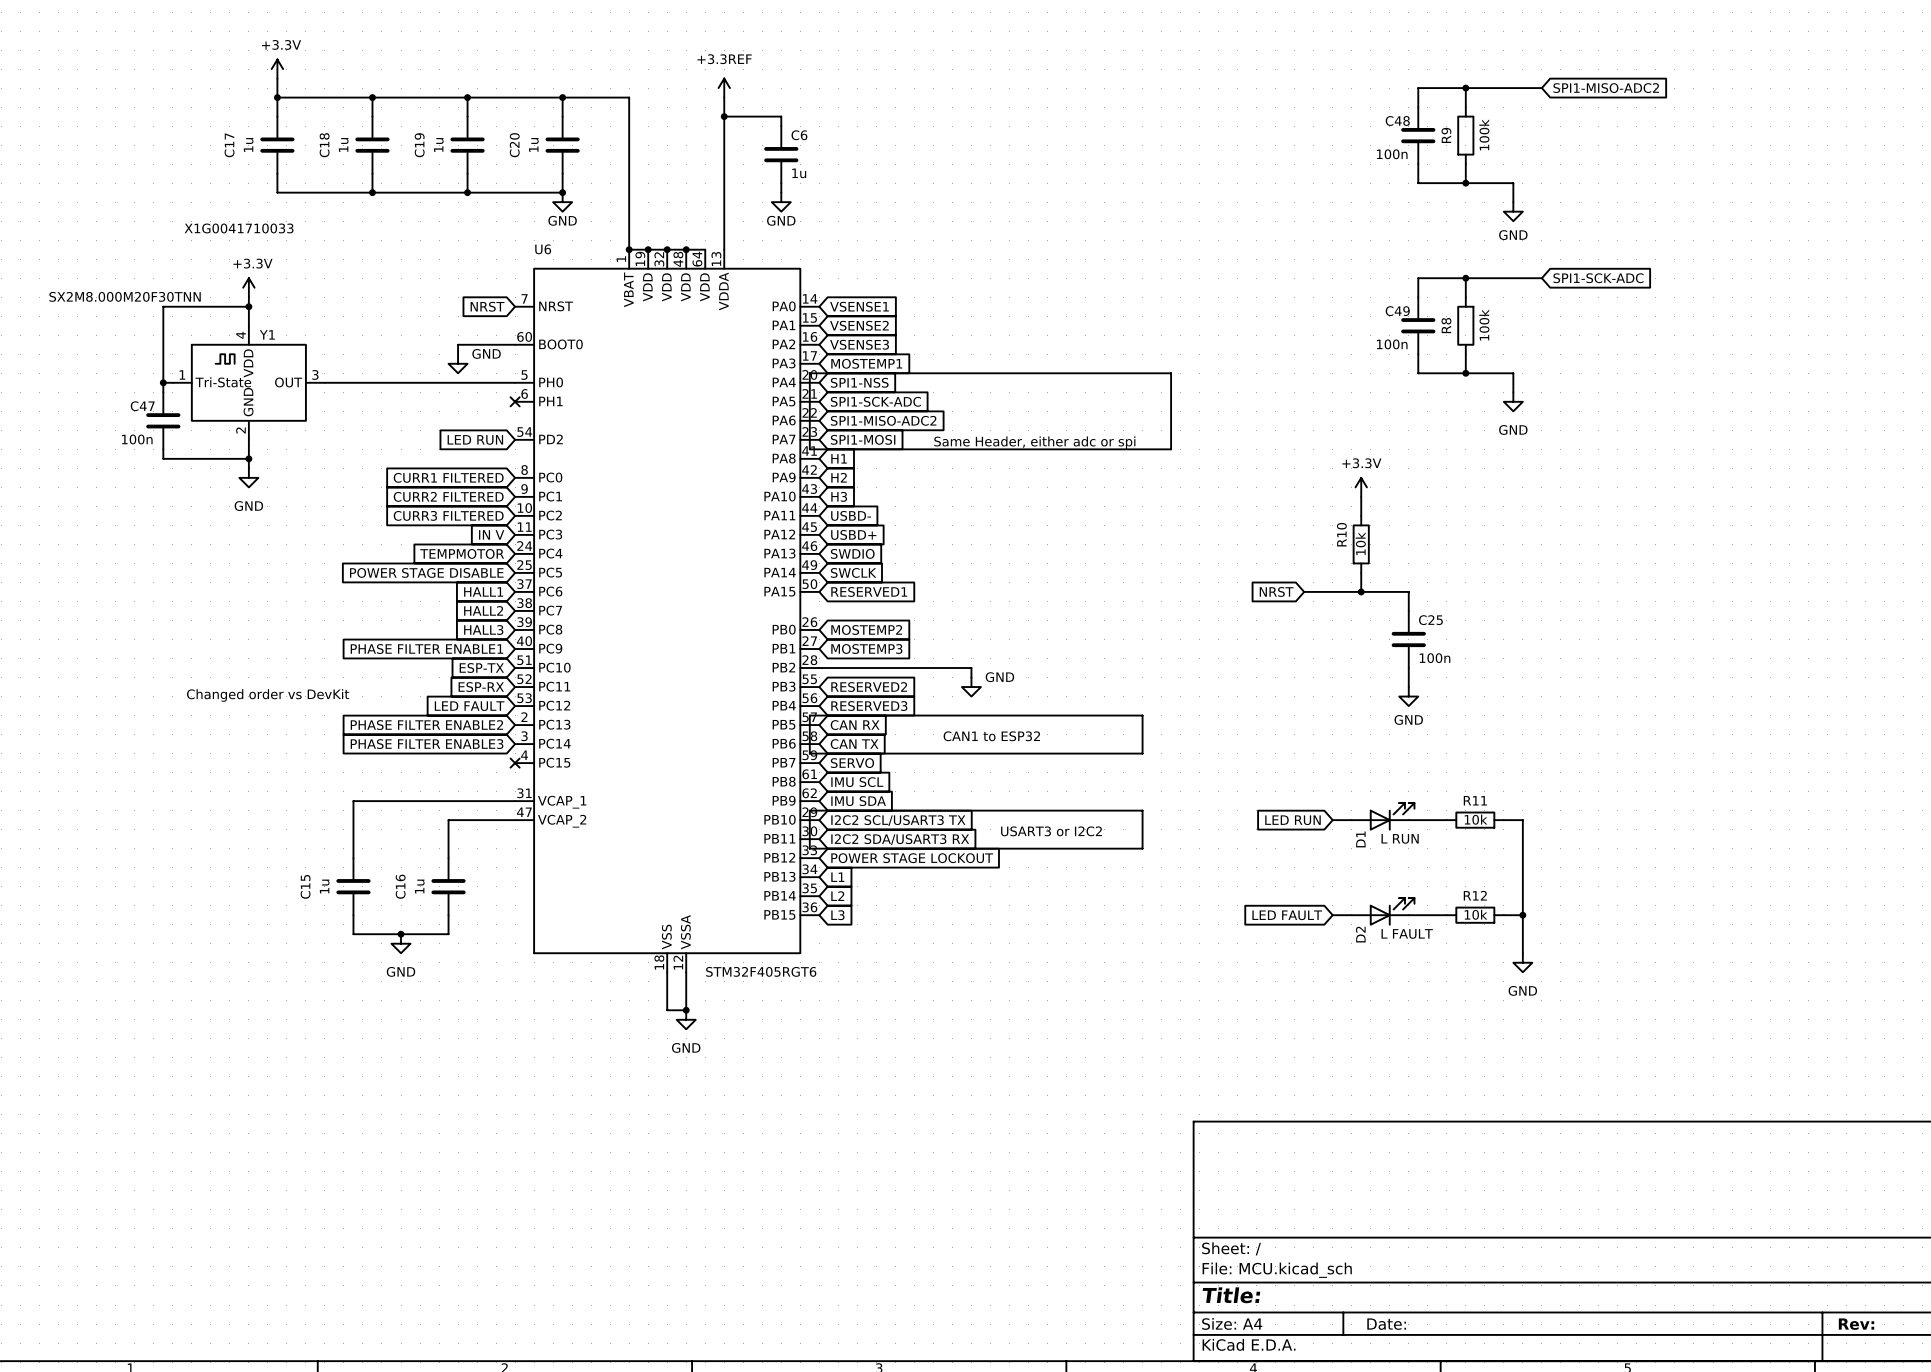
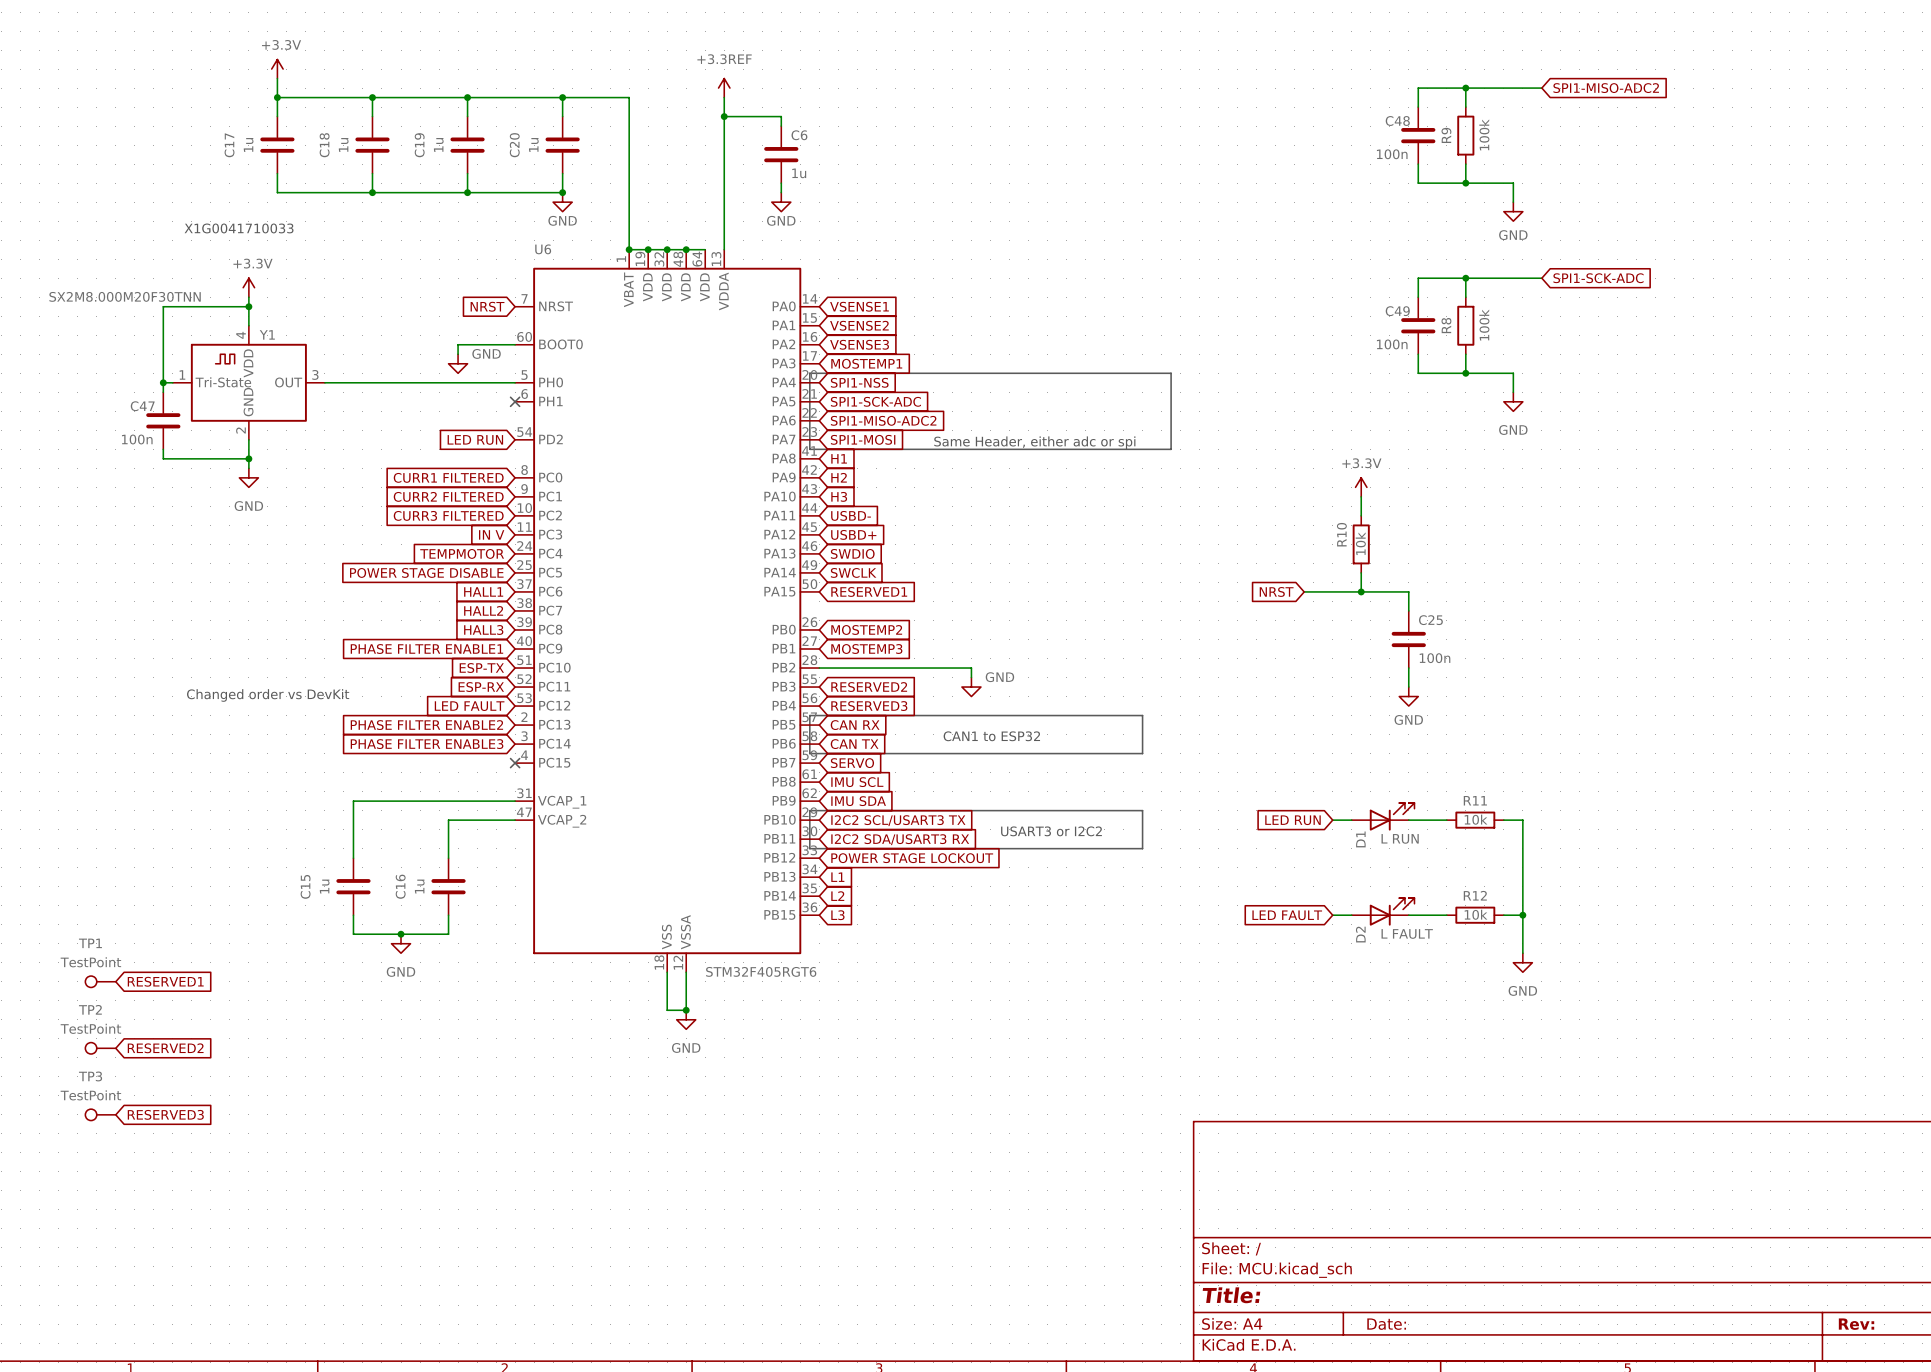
TP1: none -> TestPoint (100, 981)
global label: none -> RESERVED1 (165, 981)
TP2: none -> TestPoint (100, 1048)
global label: none -> RESERVED2 (165, 1048)
TP3: none -> TestPoint (100, 1114)
global label: none -> RESERVED3 (165, 1114)

